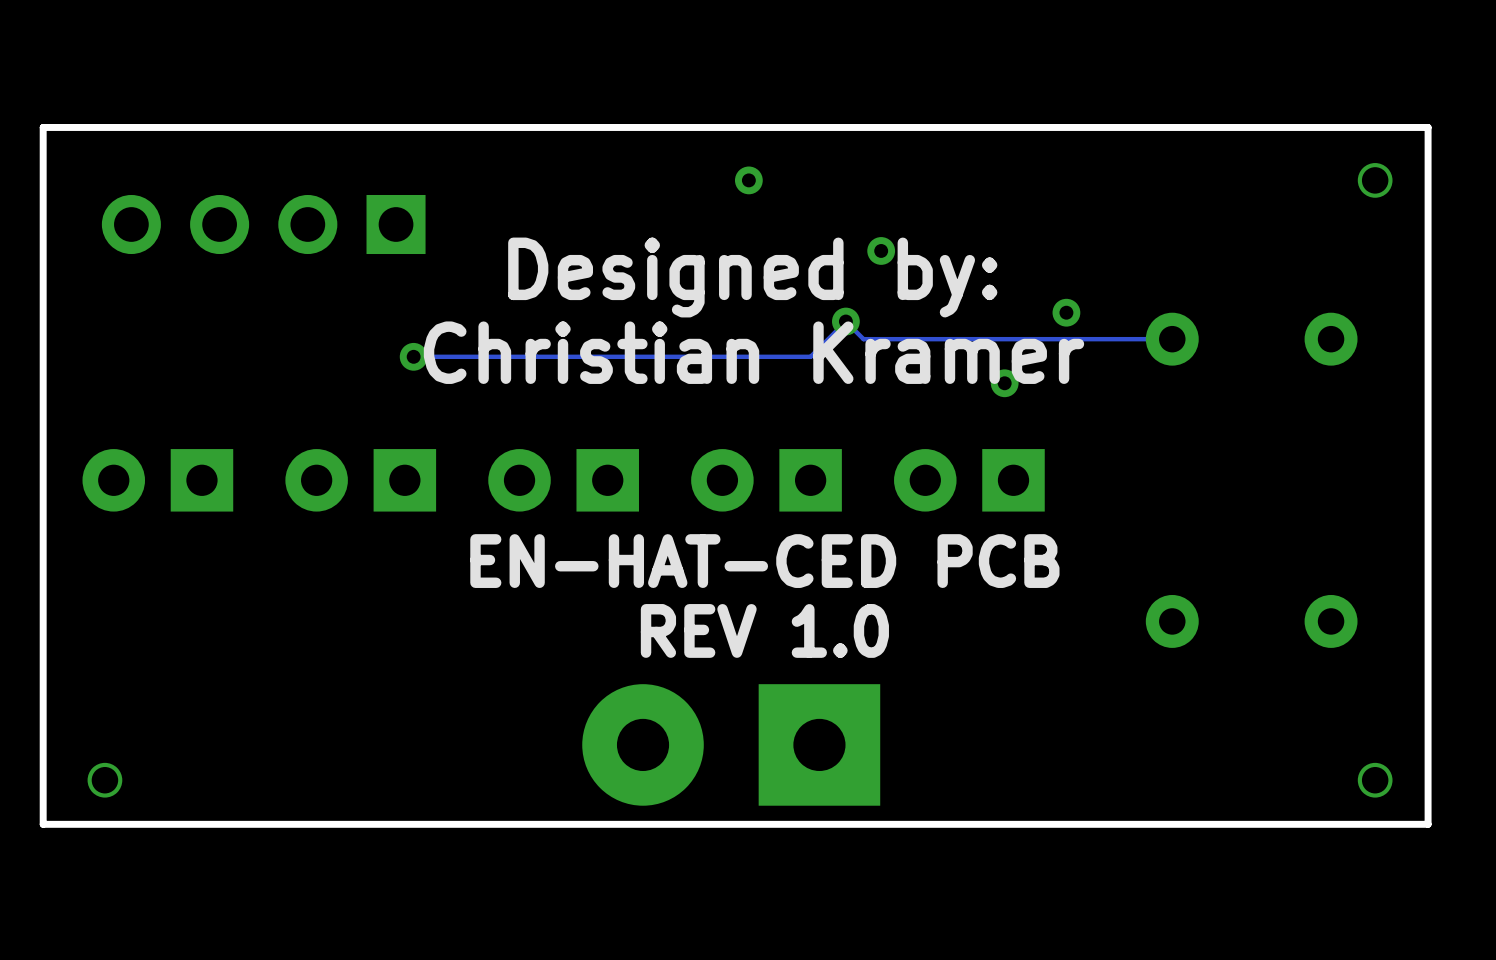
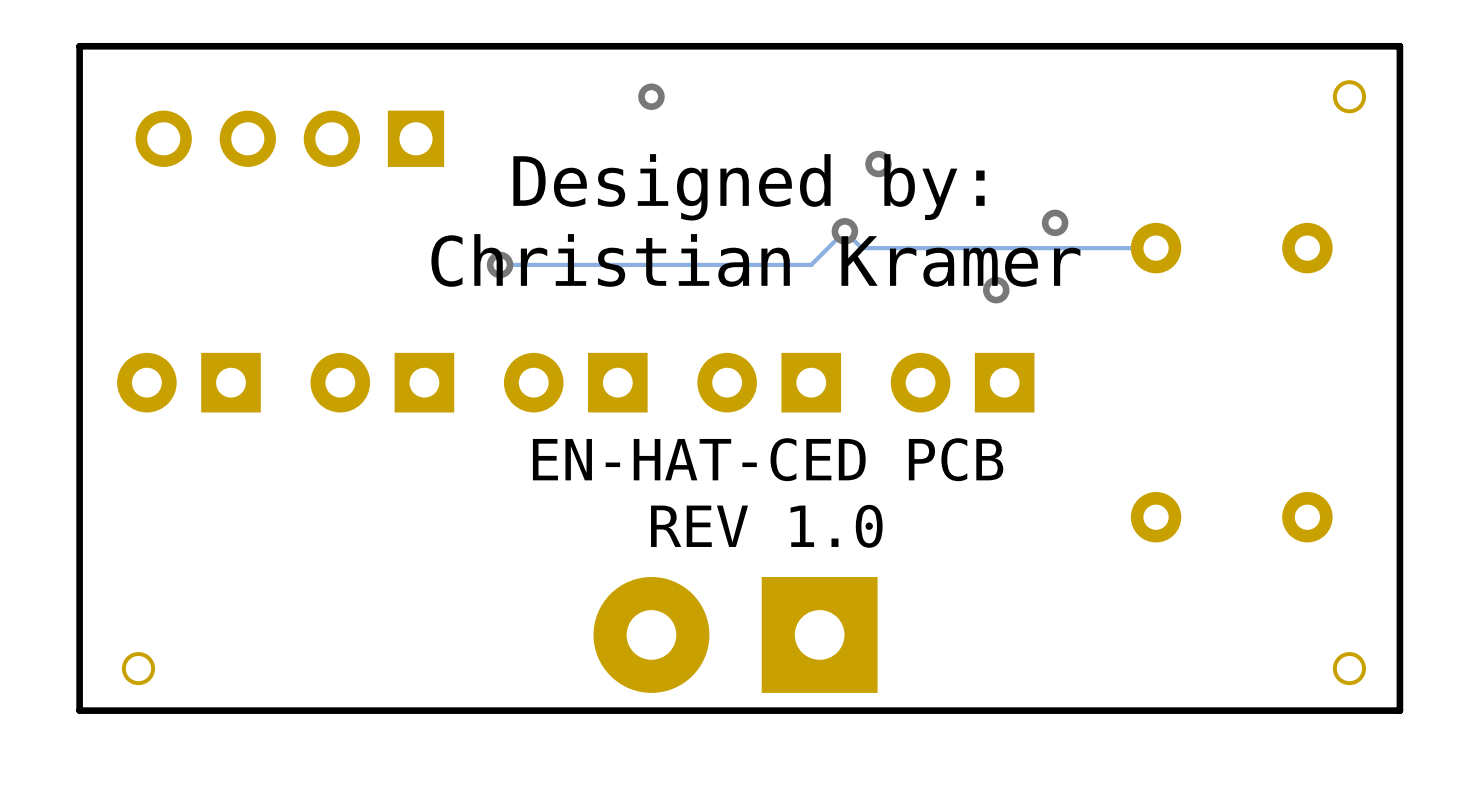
via position: (748, 180) -> (651, 96)
via position: (413, 356) -> (500, 264)
track: (484, 356) (413, 356) -> none

